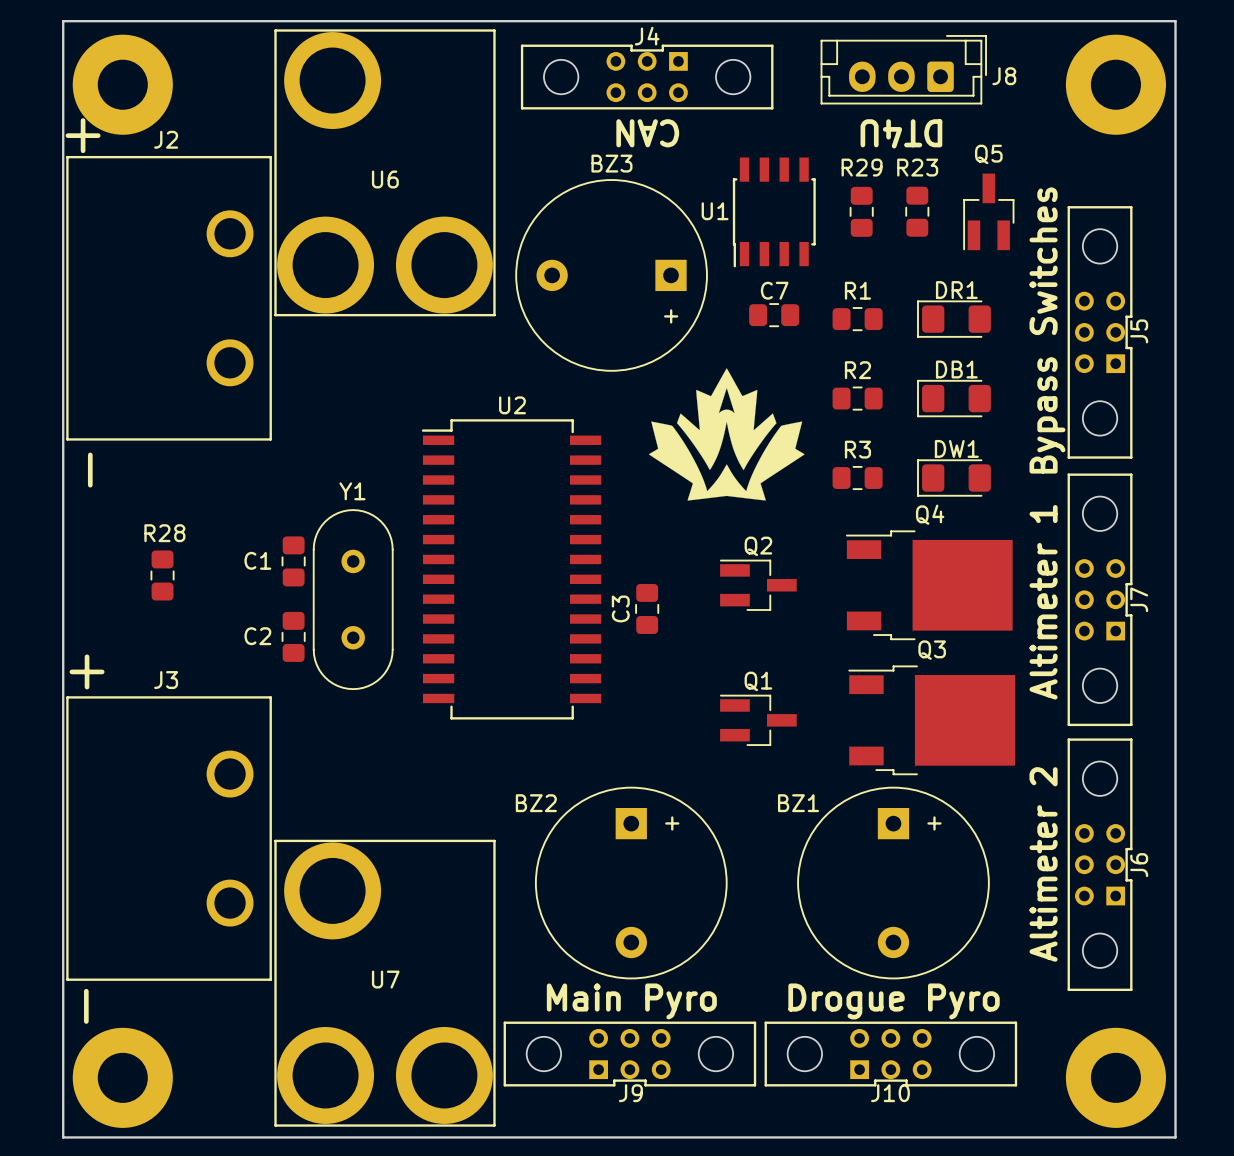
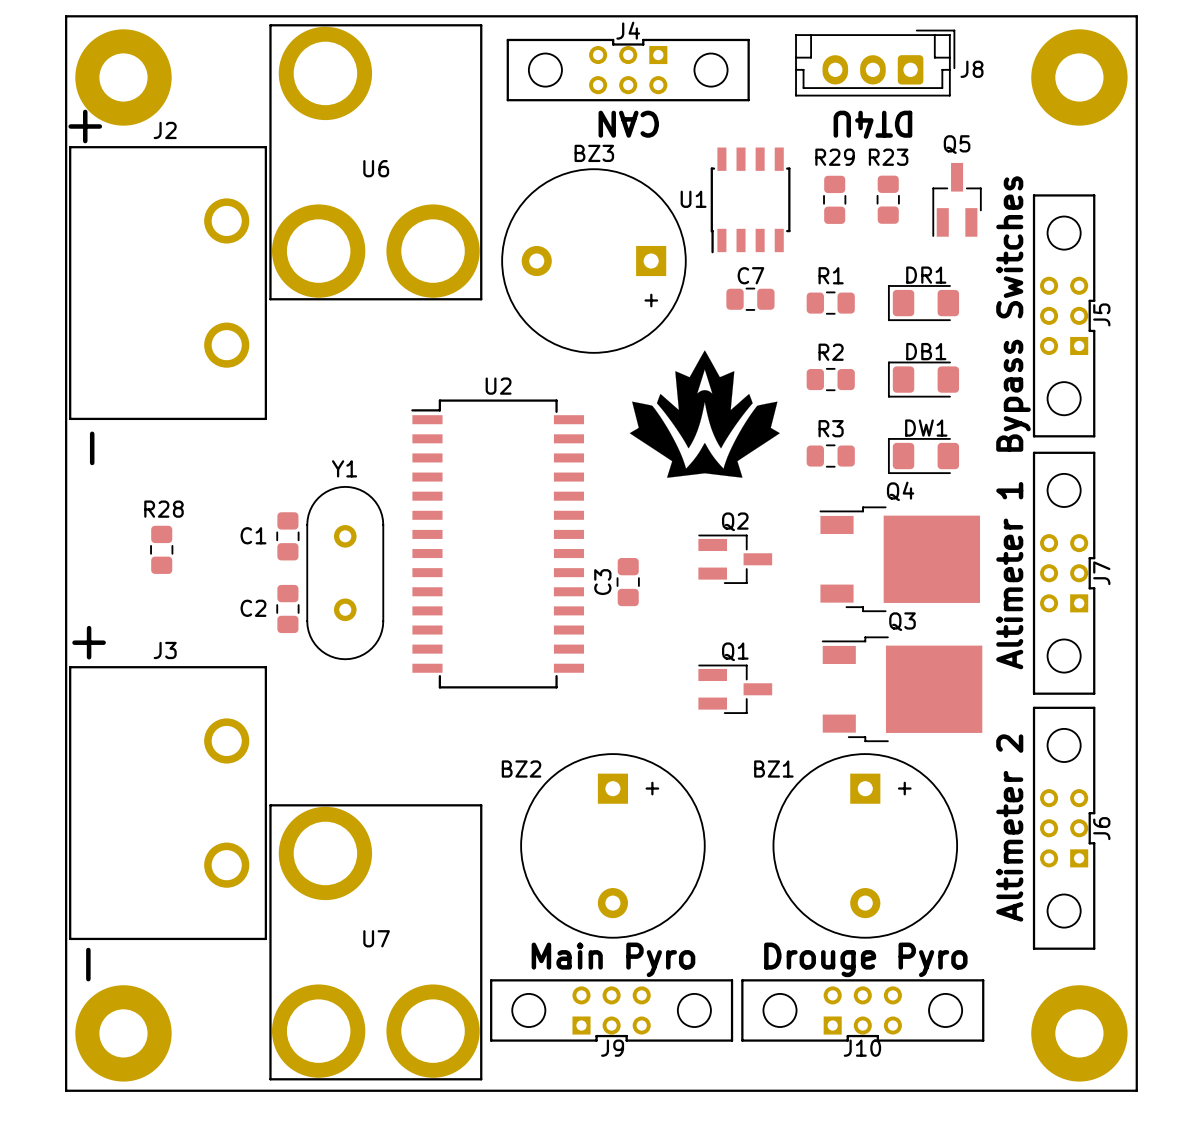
text: Drogue Pyro (894, 1001) -> Drouge Pyro (865, 959)

